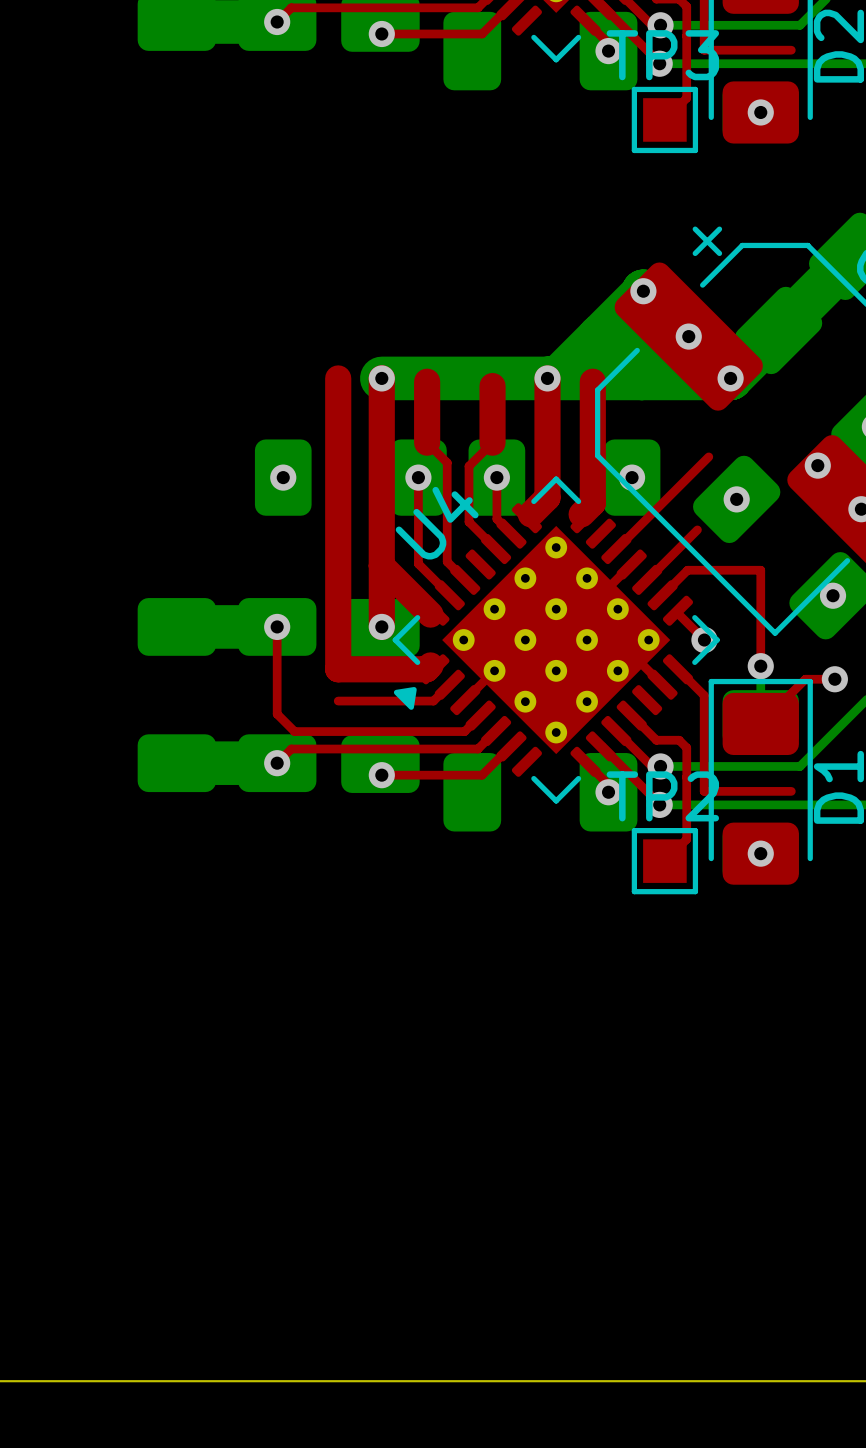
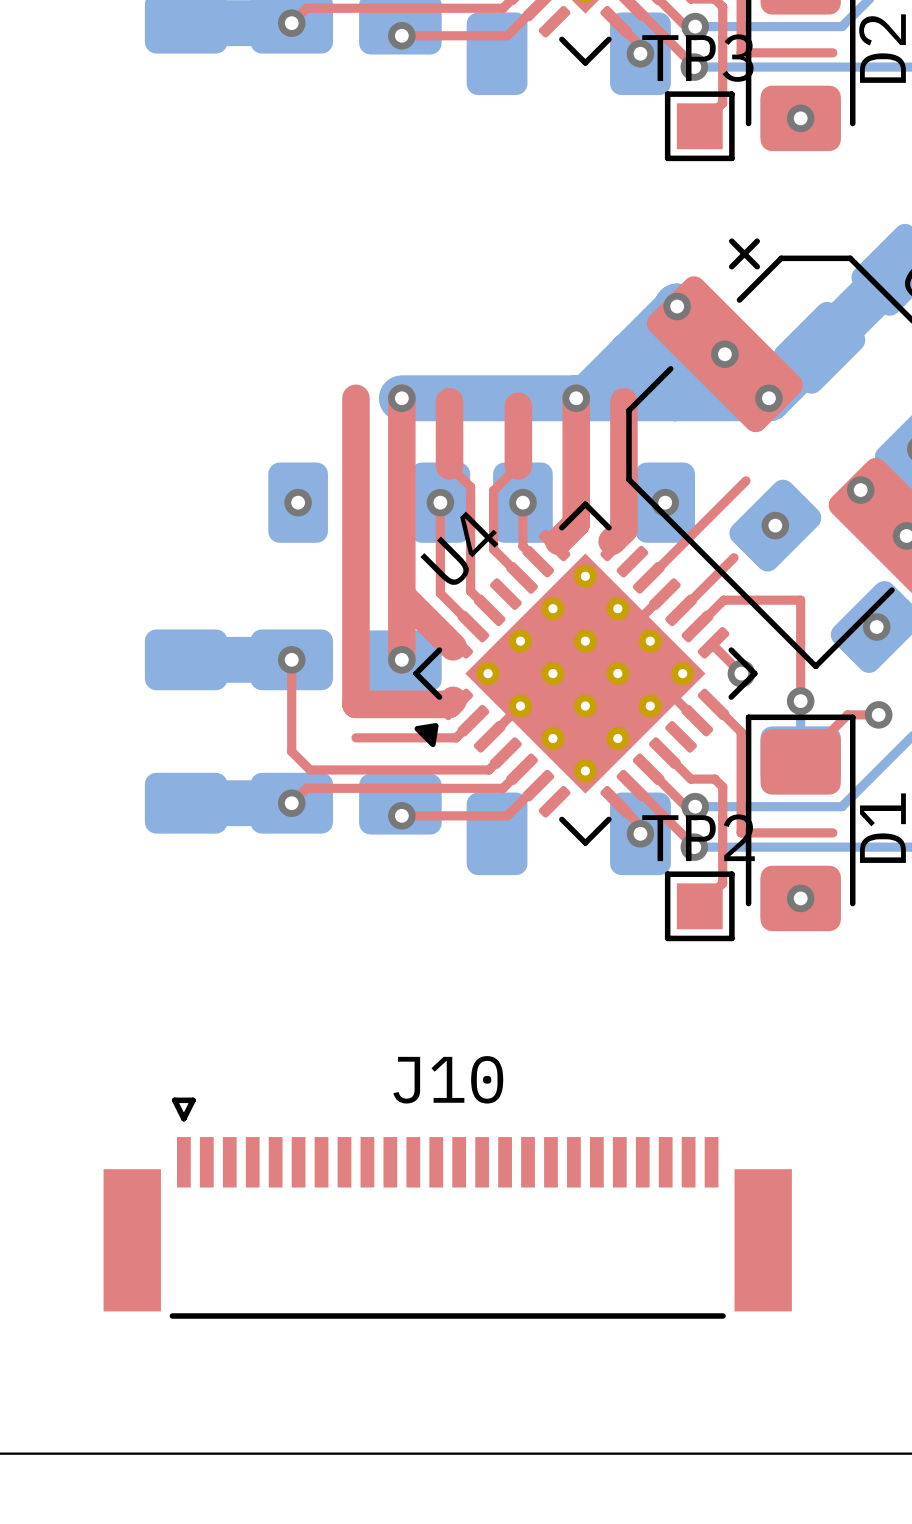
J10: none -> (447, 1208)

